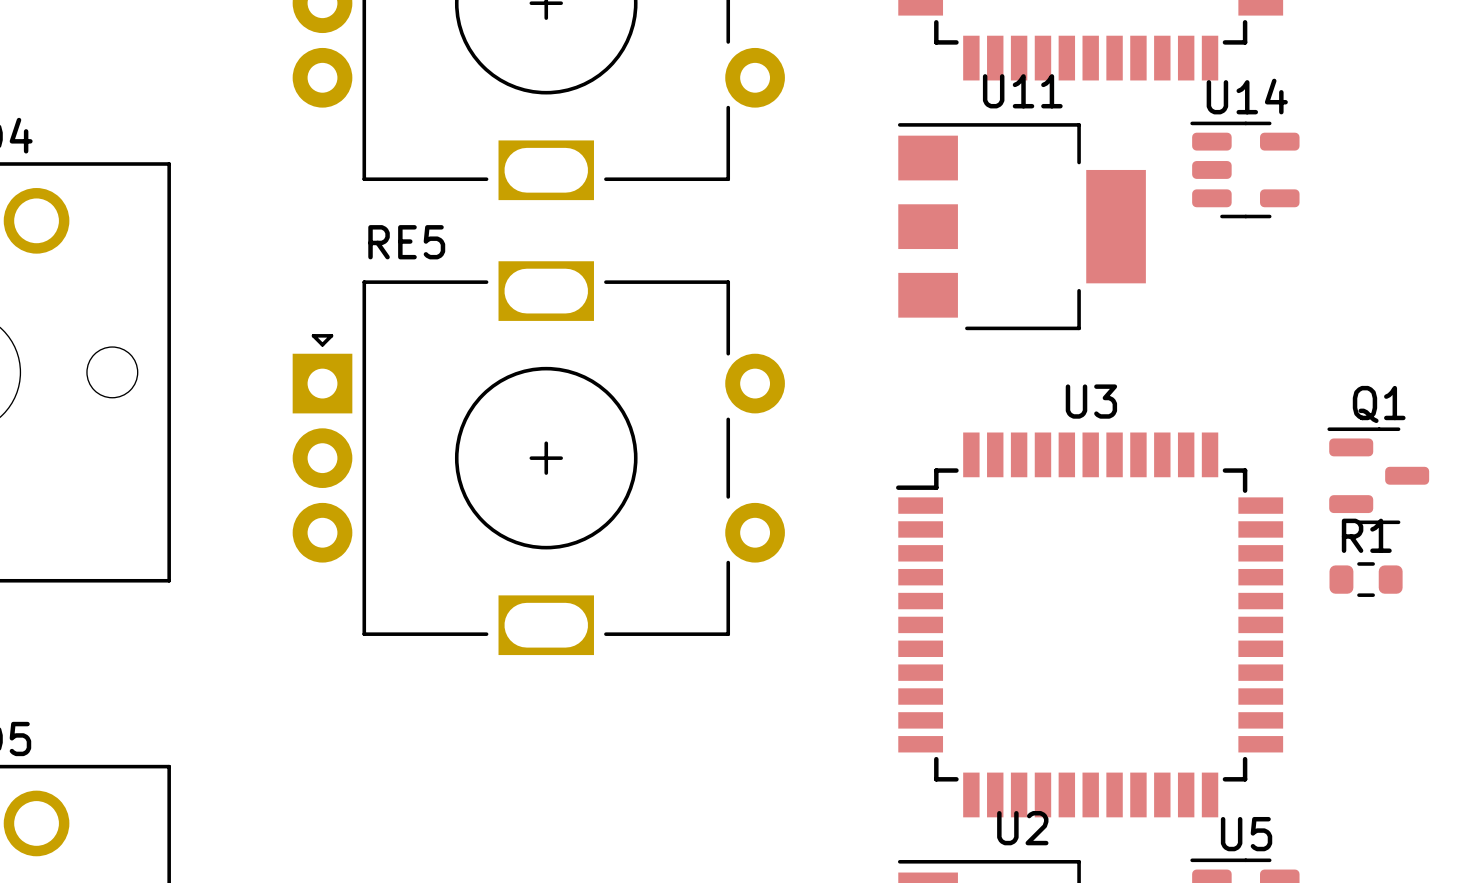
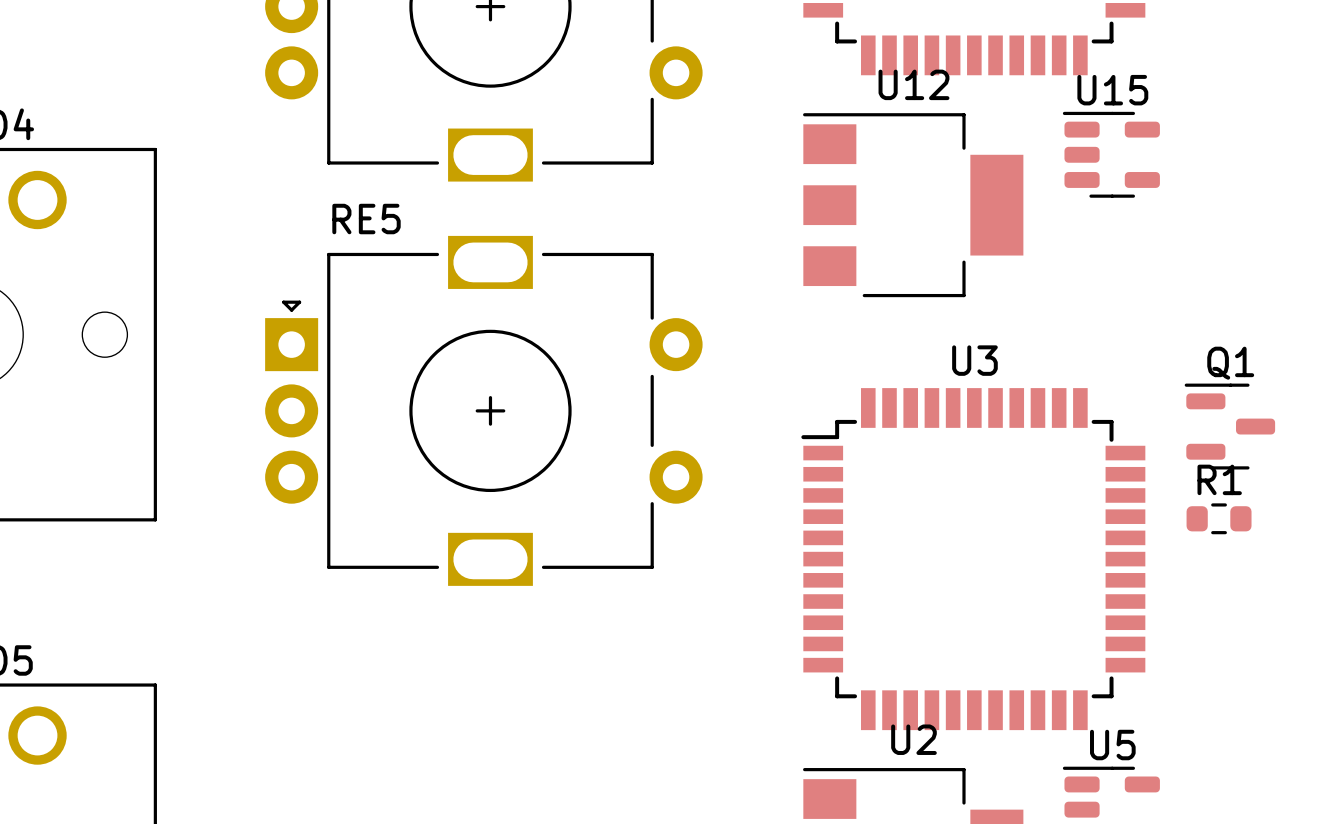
U11 name: U11 (1022, 91) -> U12 (913, 84)
U14 name: U14 (1247, 96) -> U15 (1112, 90)

